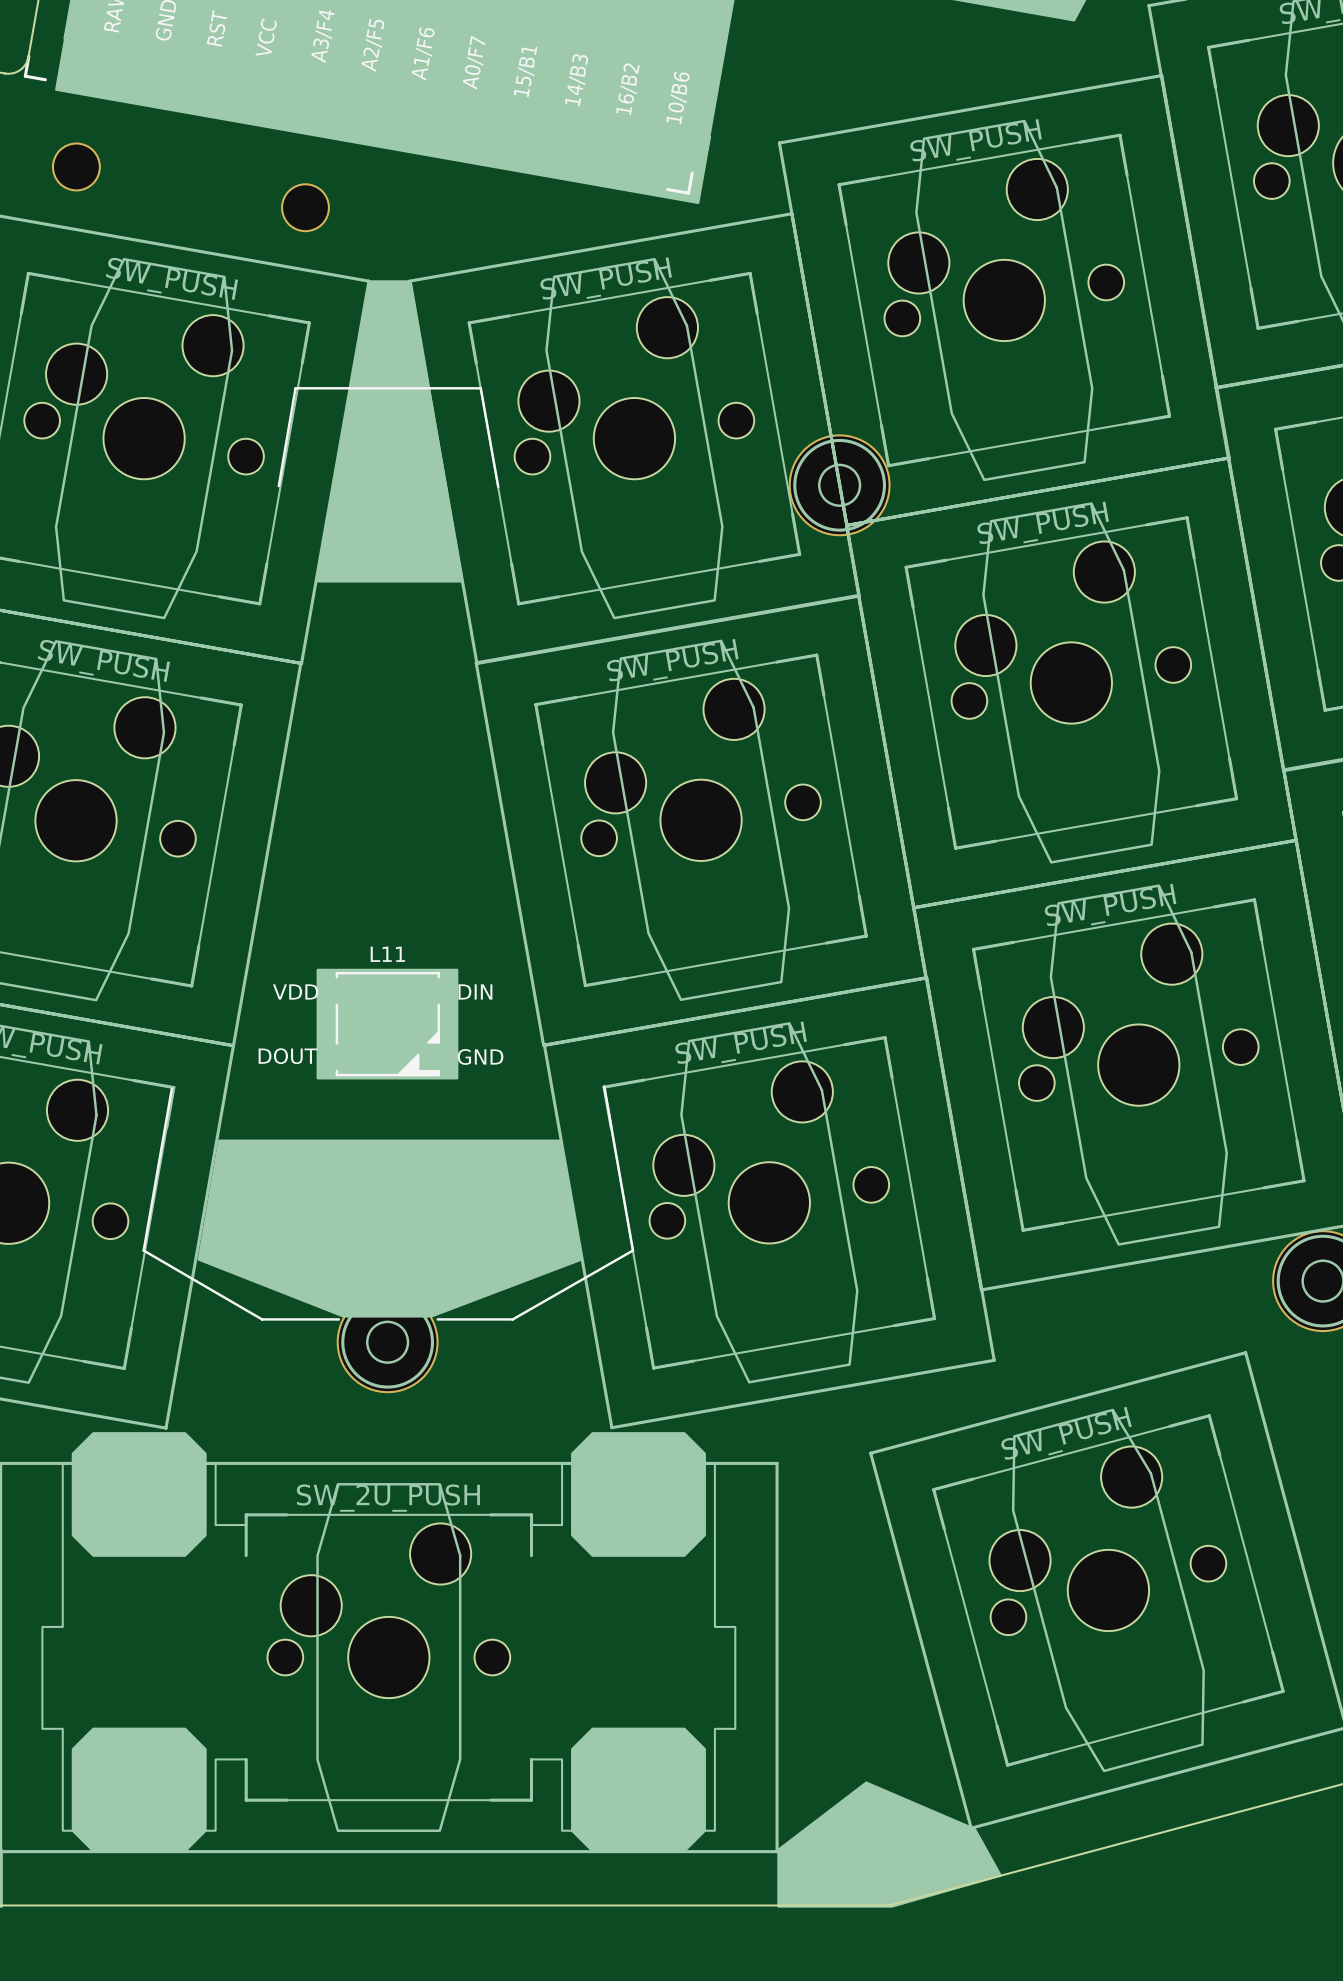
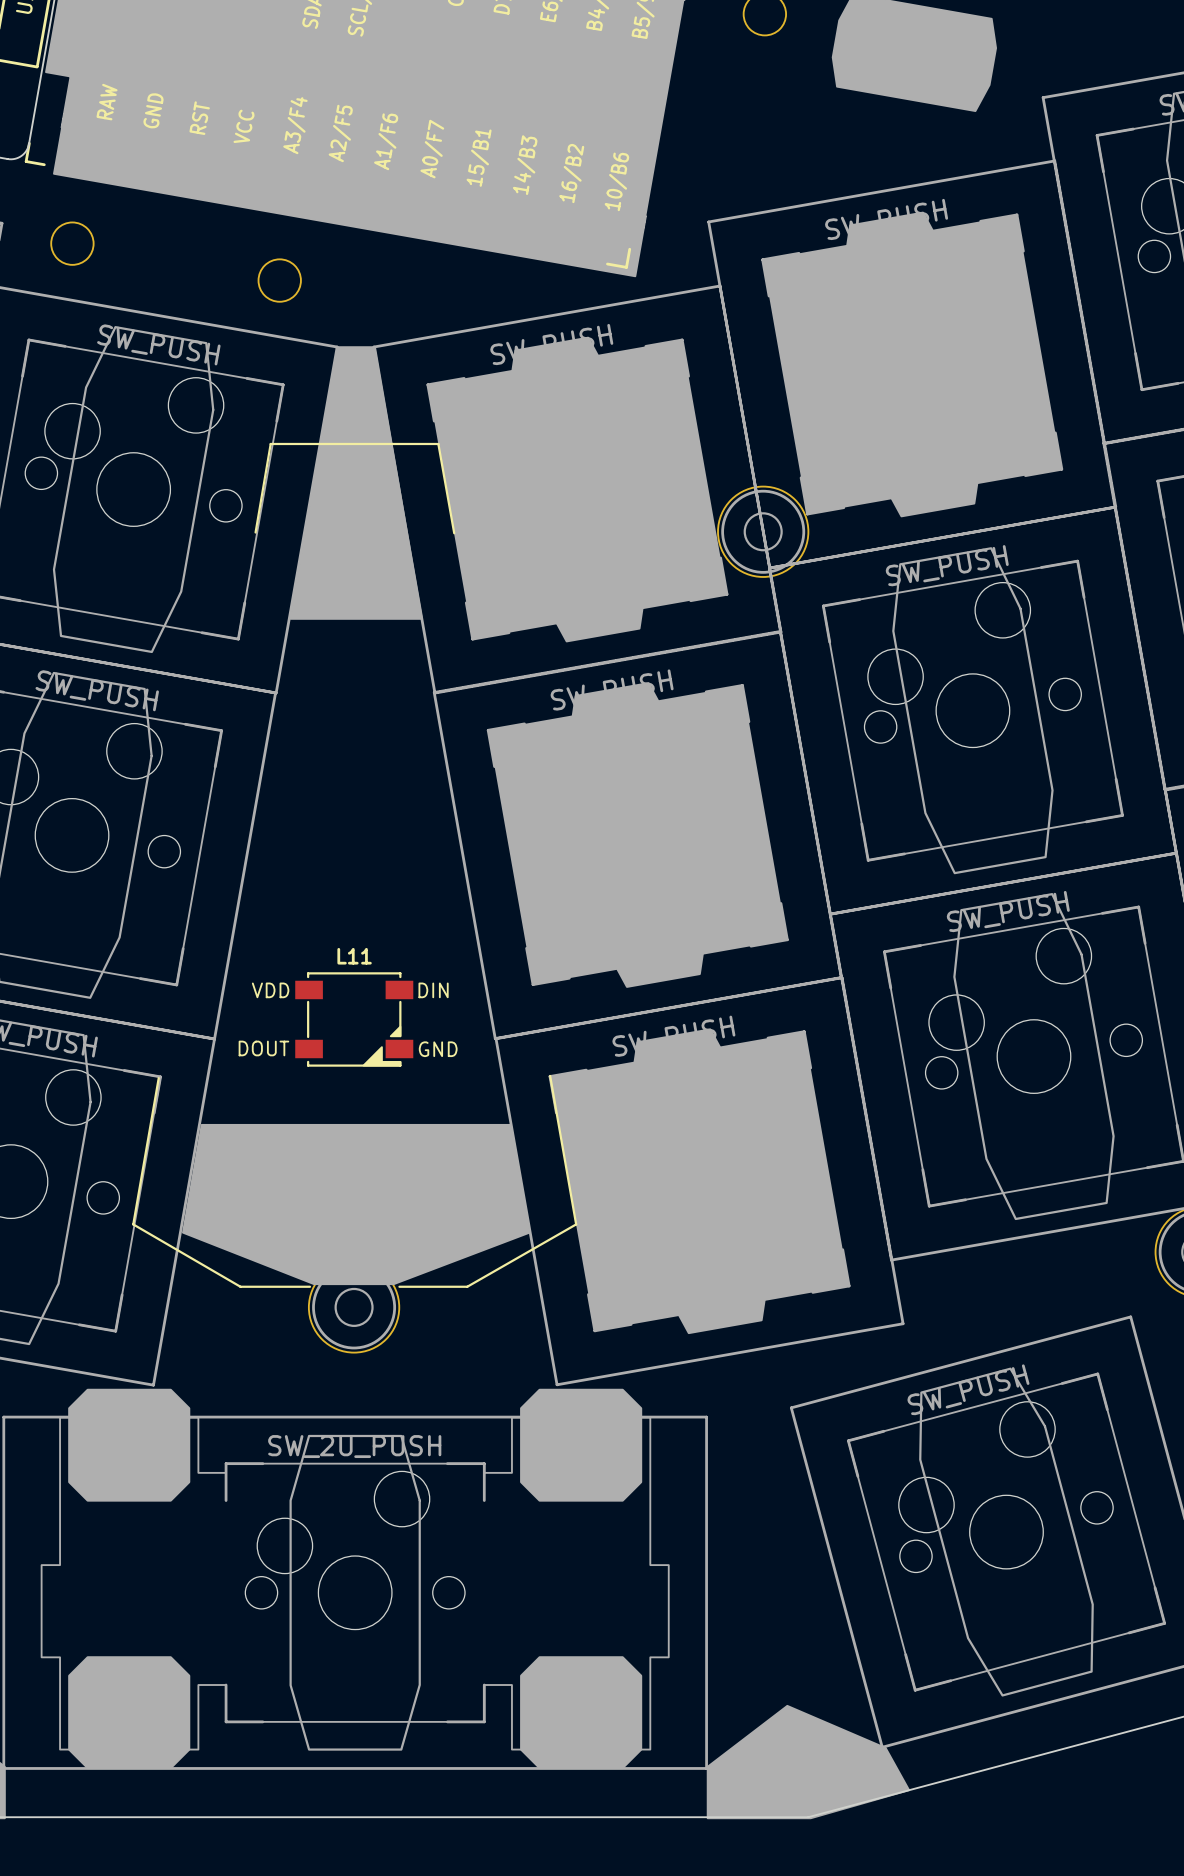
part footprint: [777, 74, 1231, 527] -> [707, 159, 1118, 570]
part footprint: [408, 212, 861, 666] -> [372, 284, 783, 695]
part footprint: [474, 593, 928, 1047] -> [432, 630, 843, 1040]
drawing: [316, 968, 459, 1080] -> none
part footprint: [542, 976, 996, 1430] -> [494, 976, 905, 1387]

